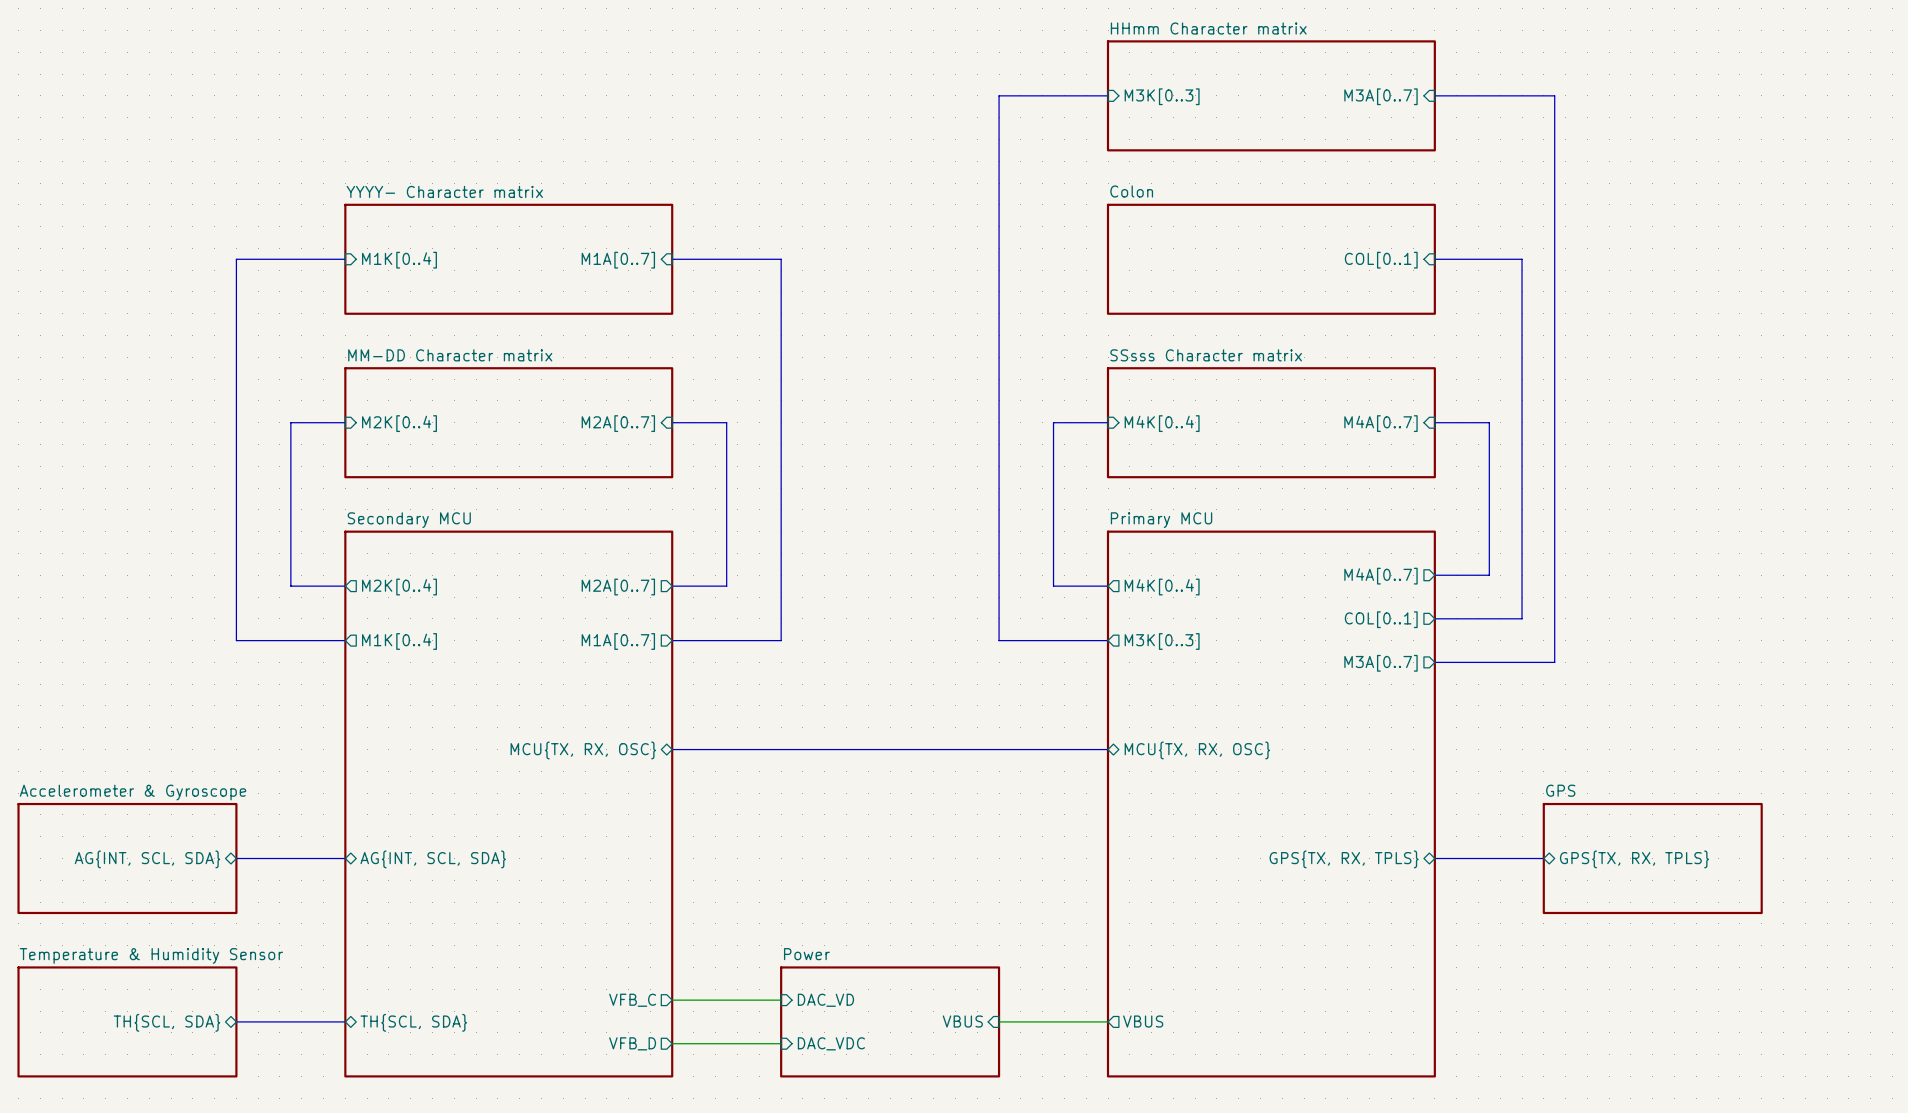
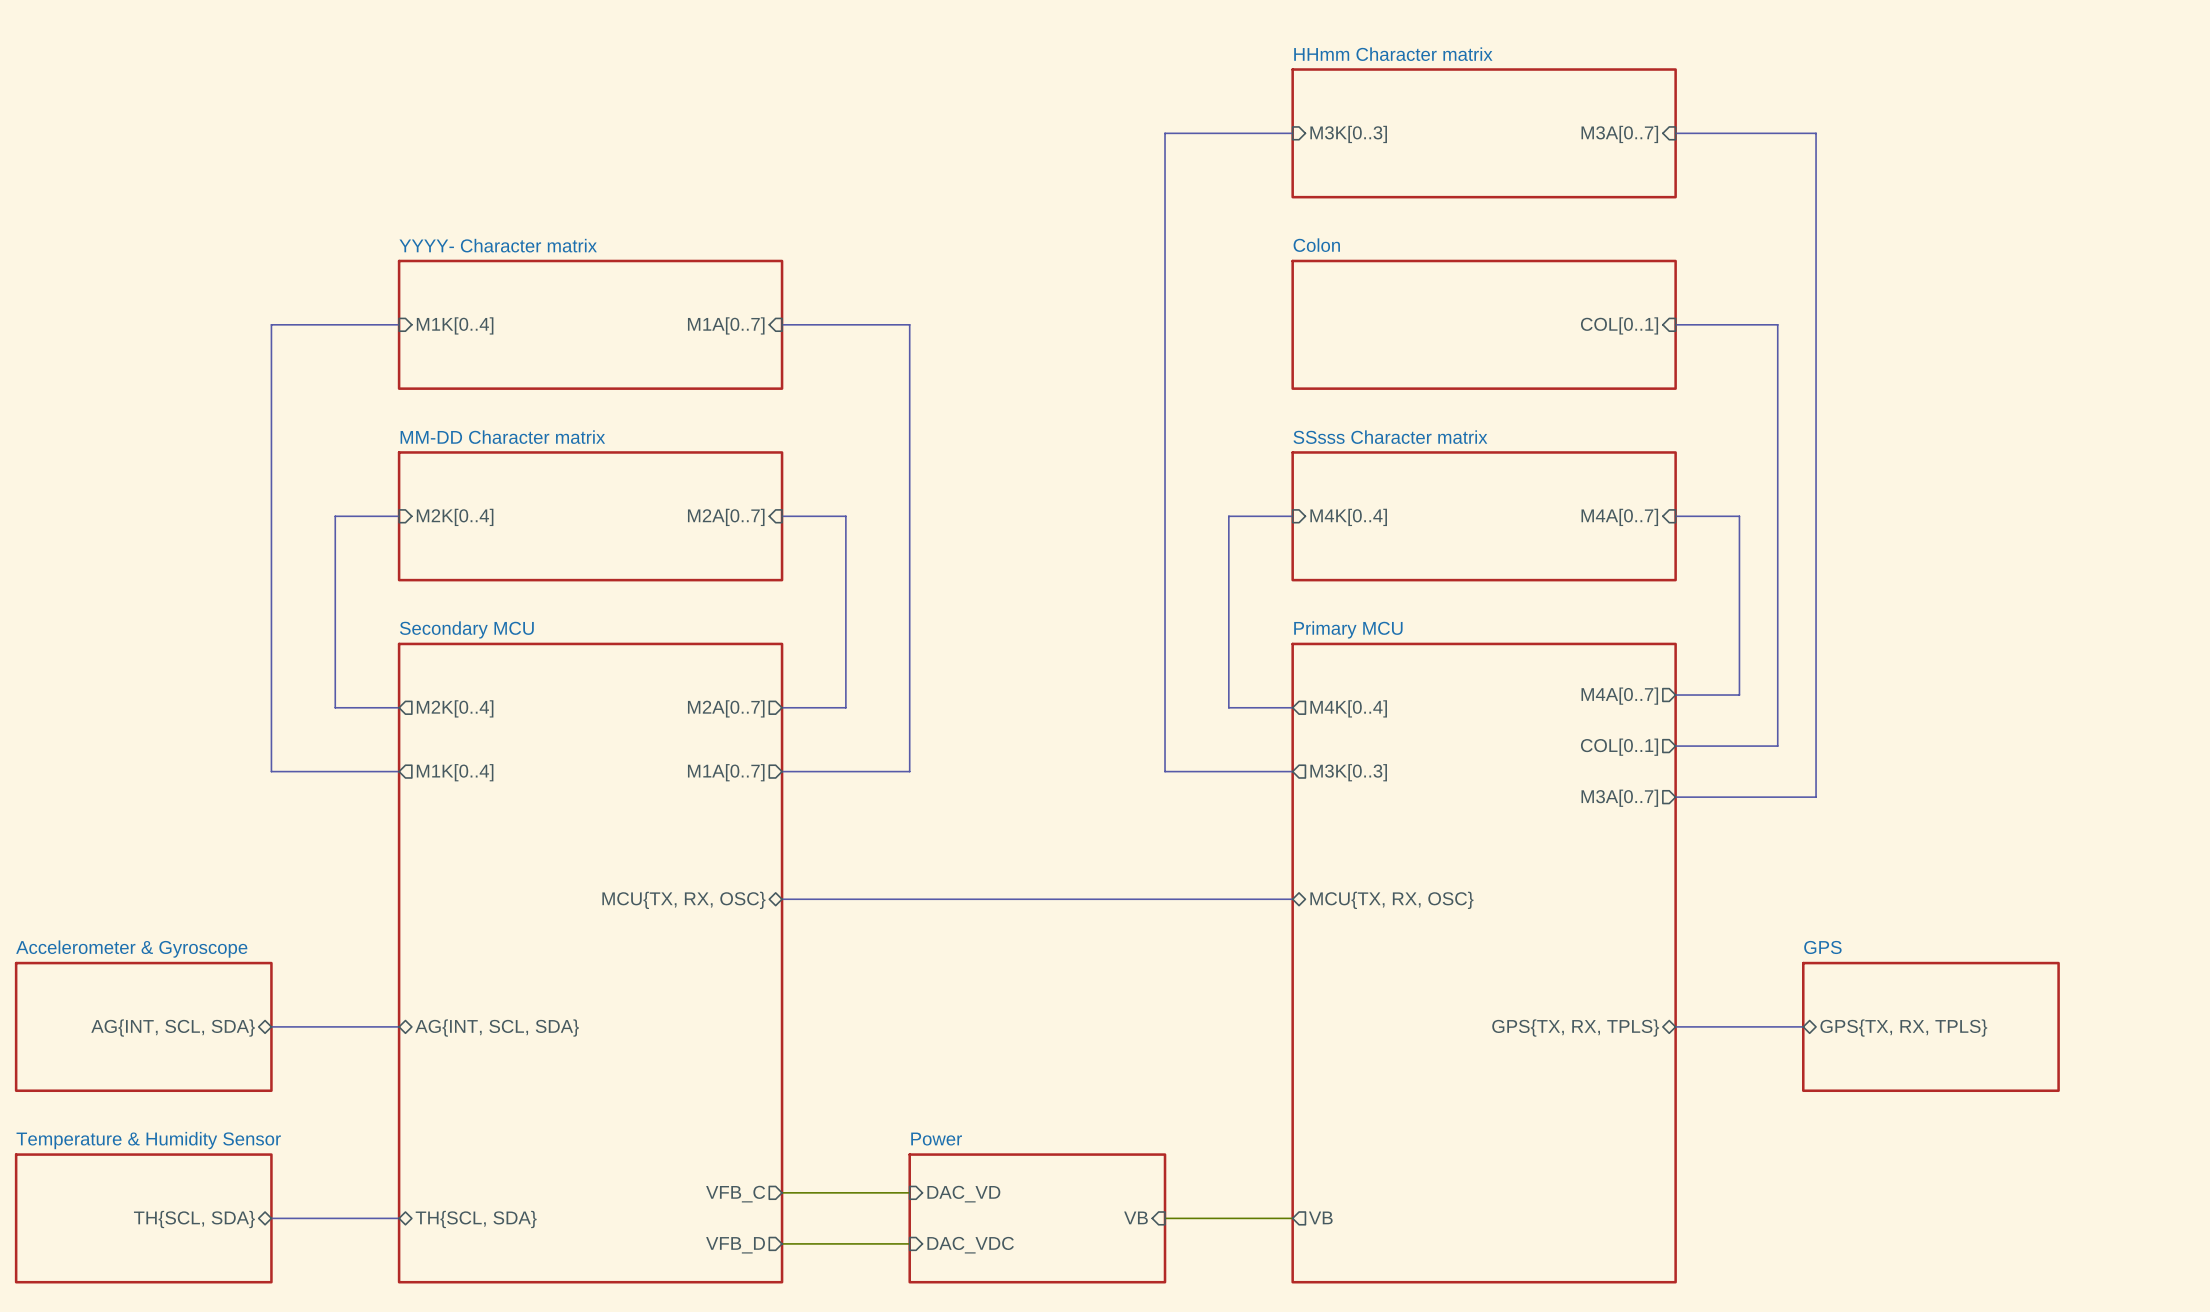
sheet pin: VBUS (962, 1021) -> VB (1135, 1217)
sheet pin: VBUS (1143, 1021) -> VB (1320, 1217)

